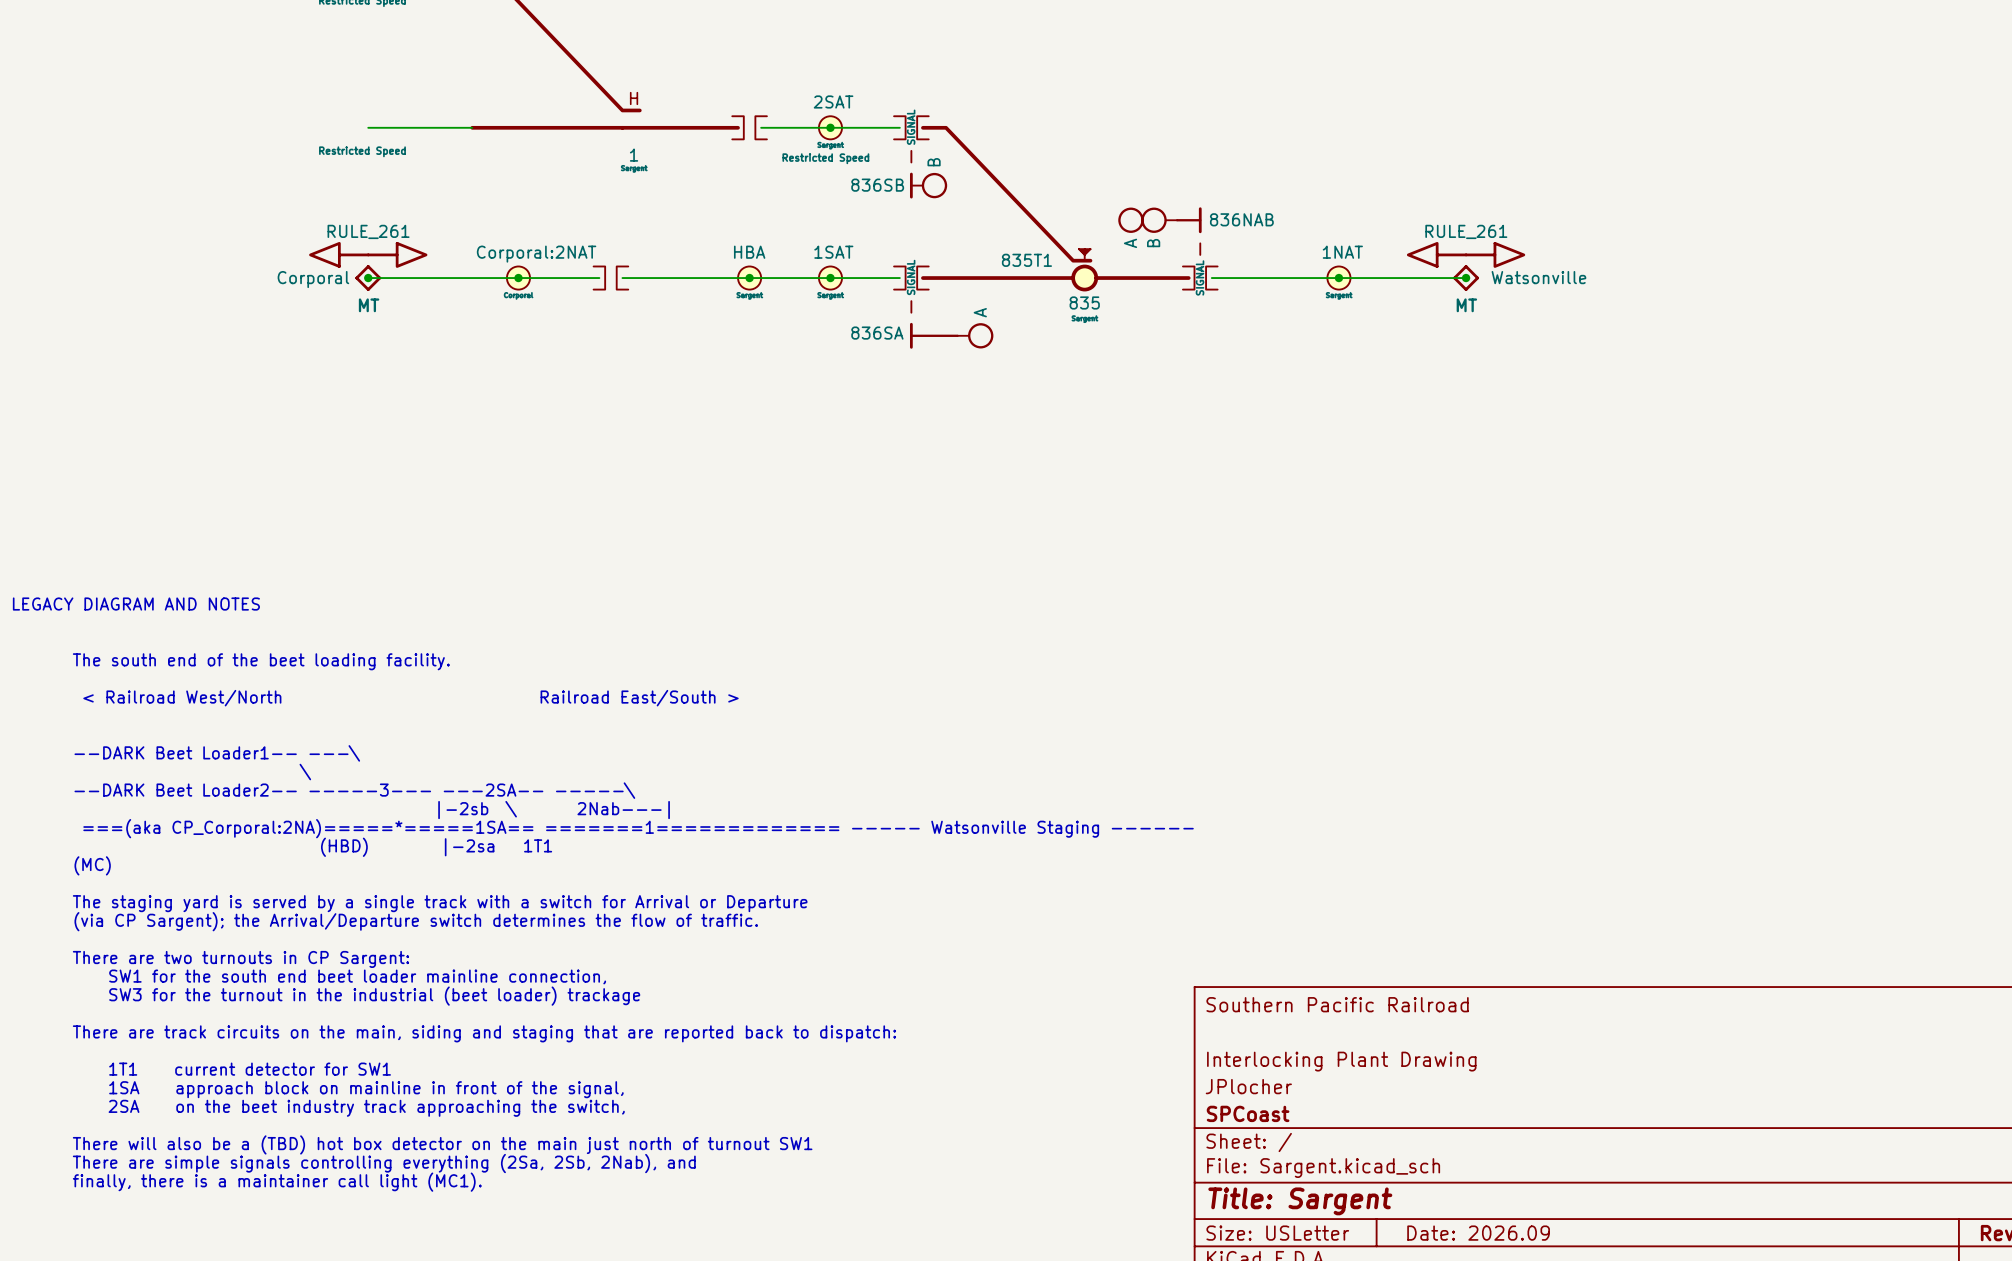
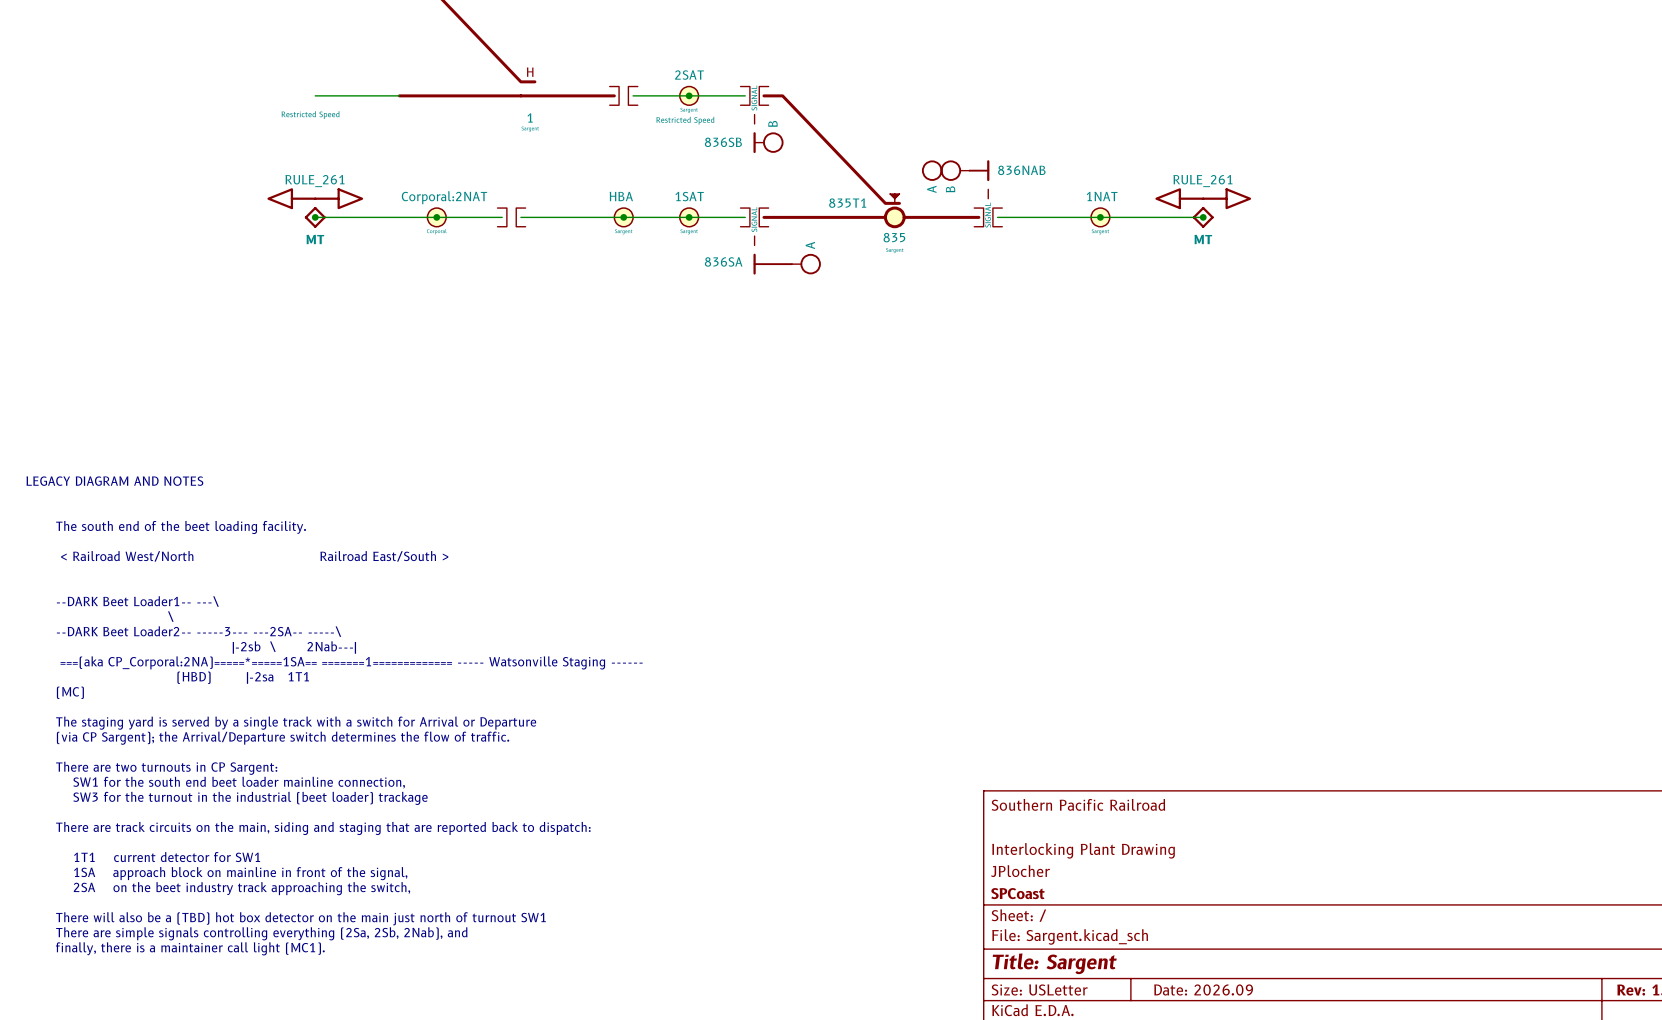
part value: Watsonville (1538, 277) -> none
part value: Corporal (313, 279) -> none

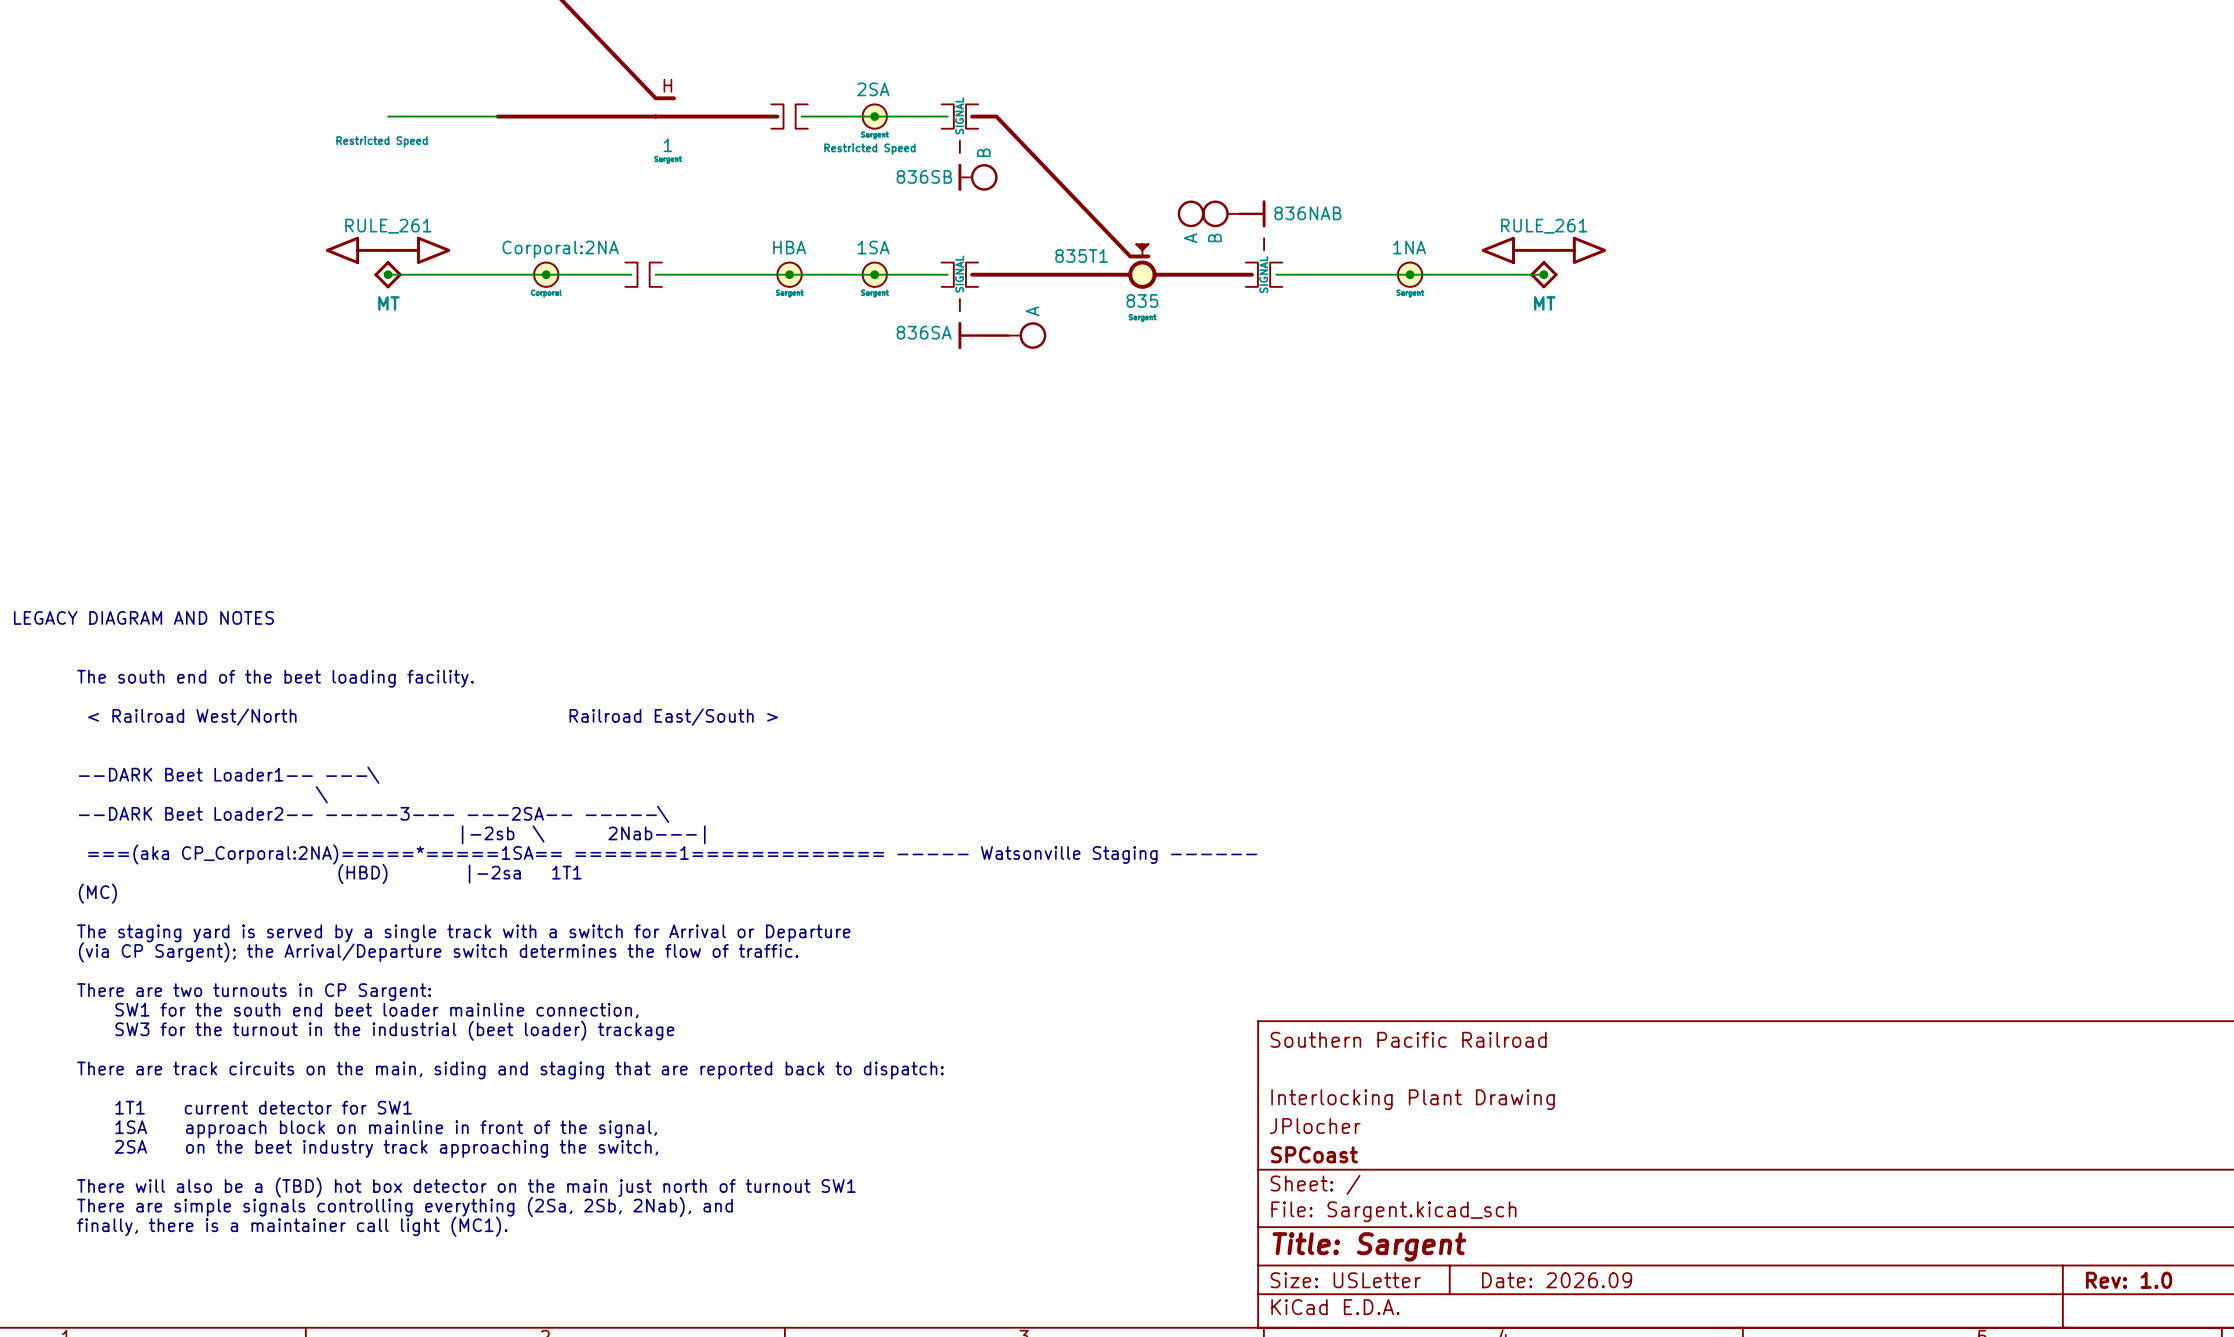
part value: 2SAT (689, 75) -> 2SA (873, 89)
part value: 1SAT (689, 196) -> 1SA (873, 247)
part value: 1NAT (1102, 196) -> 1NA (1409, 247)
part value: Corporal:2NAT (444, 197) -> Corporal:2NA (560, 249)

